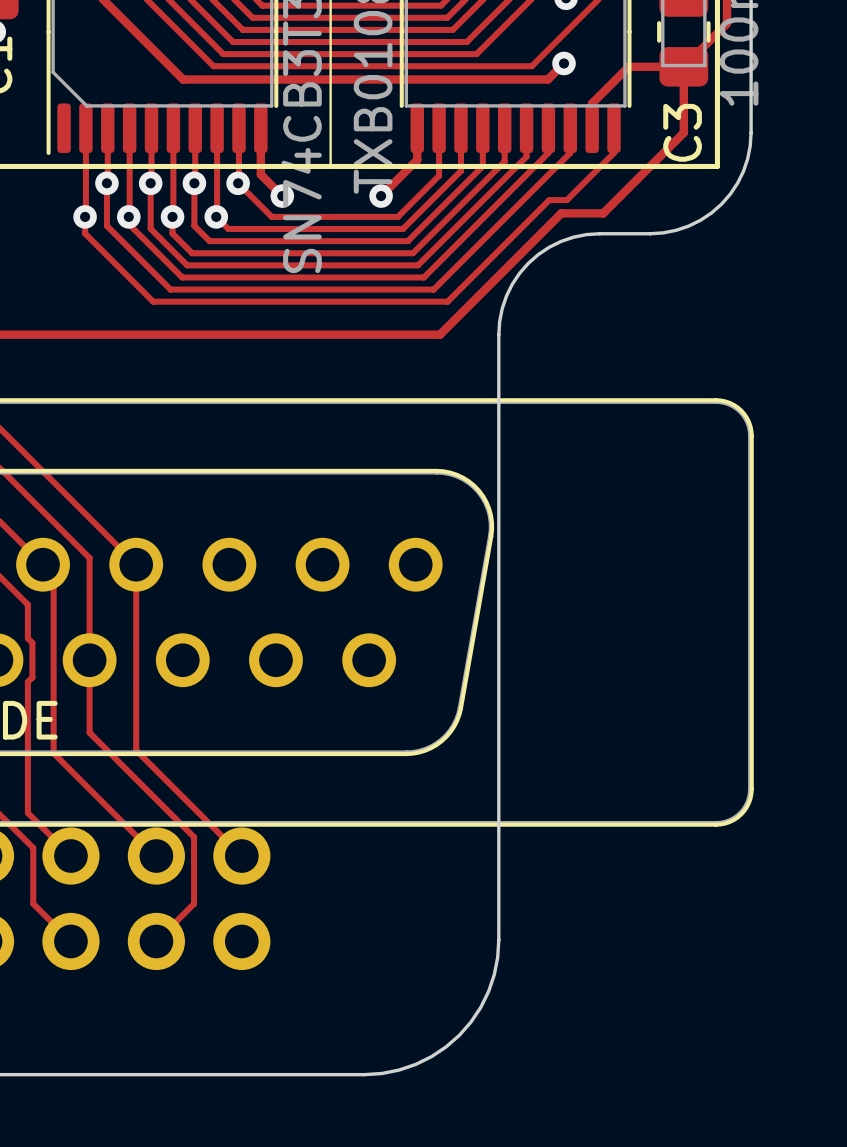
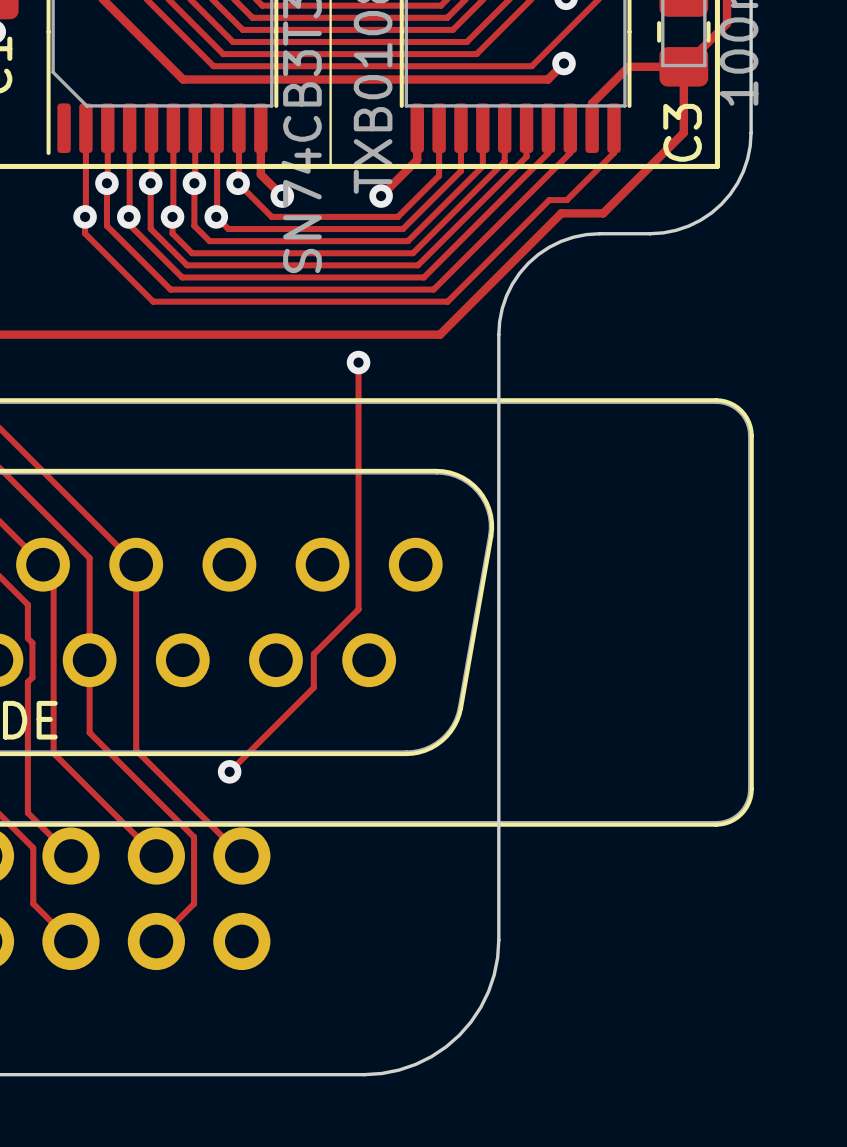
track: none -> (358, 362) (358, 609) (313, 654) (313, 687) (229, 771)
via: none -> (358, 362)
via: none -> (229, 771)

